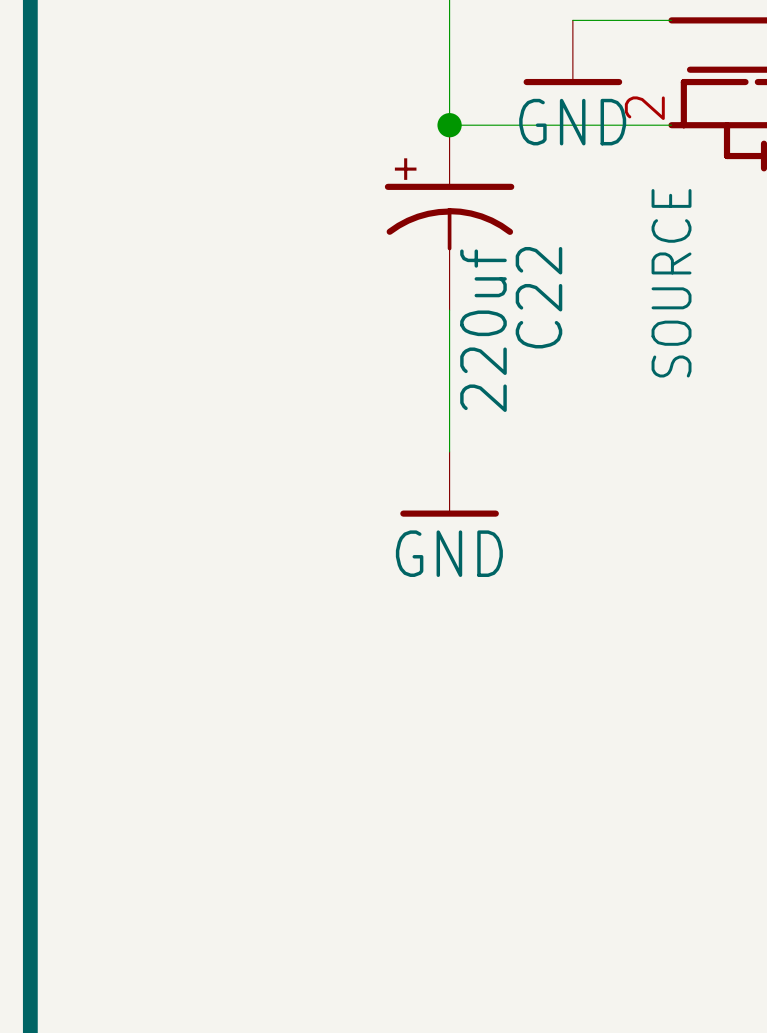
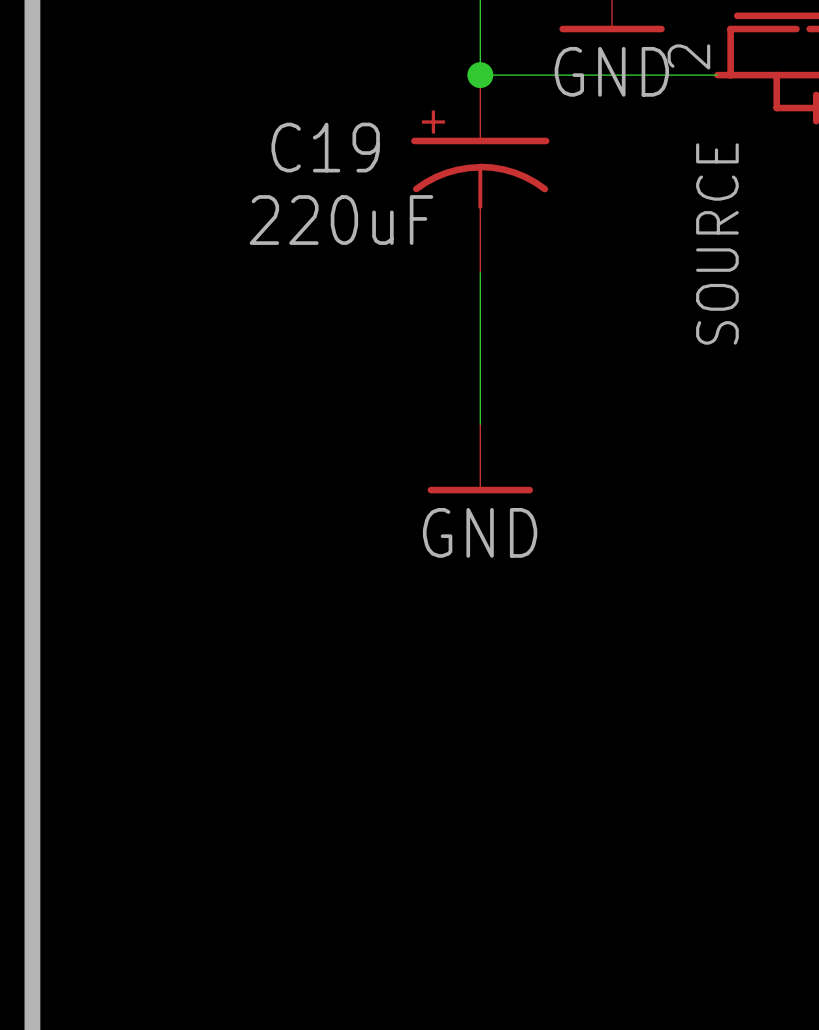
C22 name: C22 (538, 297) -> C19 (325, 147)
C22 value: 220uf (483, 330) -> 220uF (341, 220)

